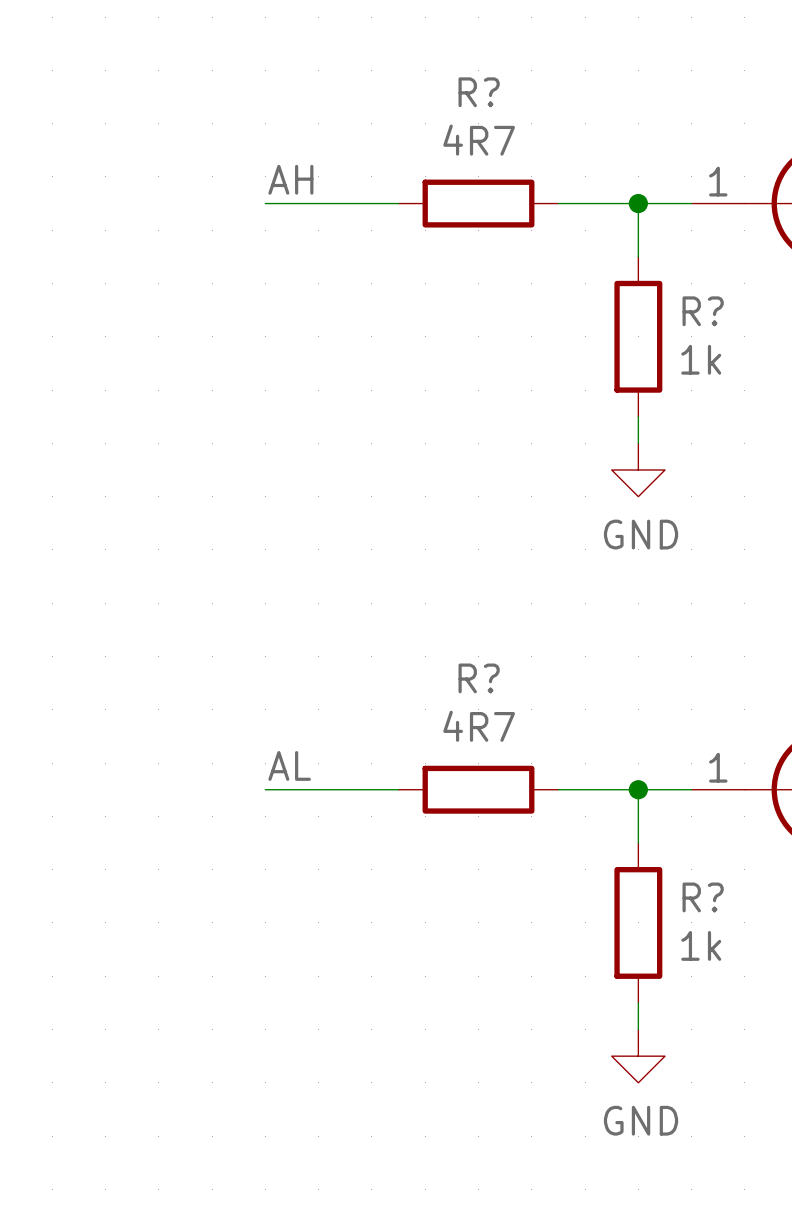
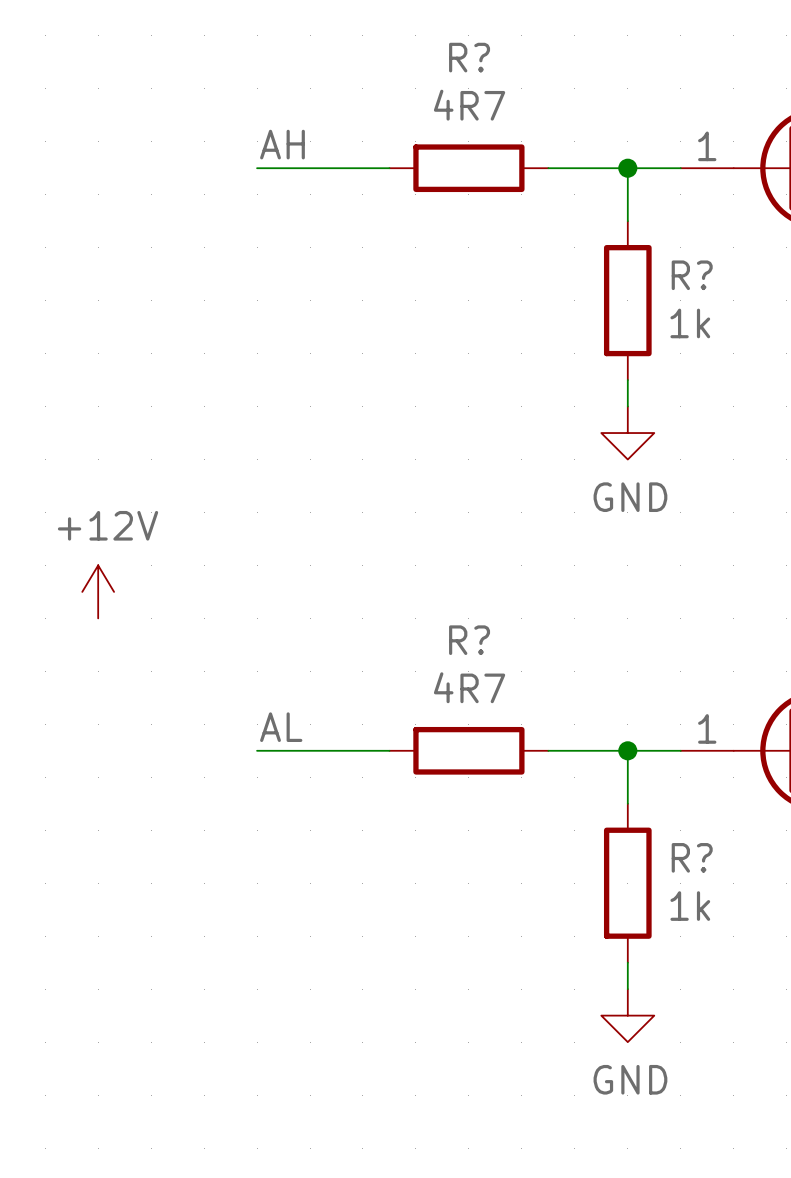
power symbol: none -> +12V (98, 591)

